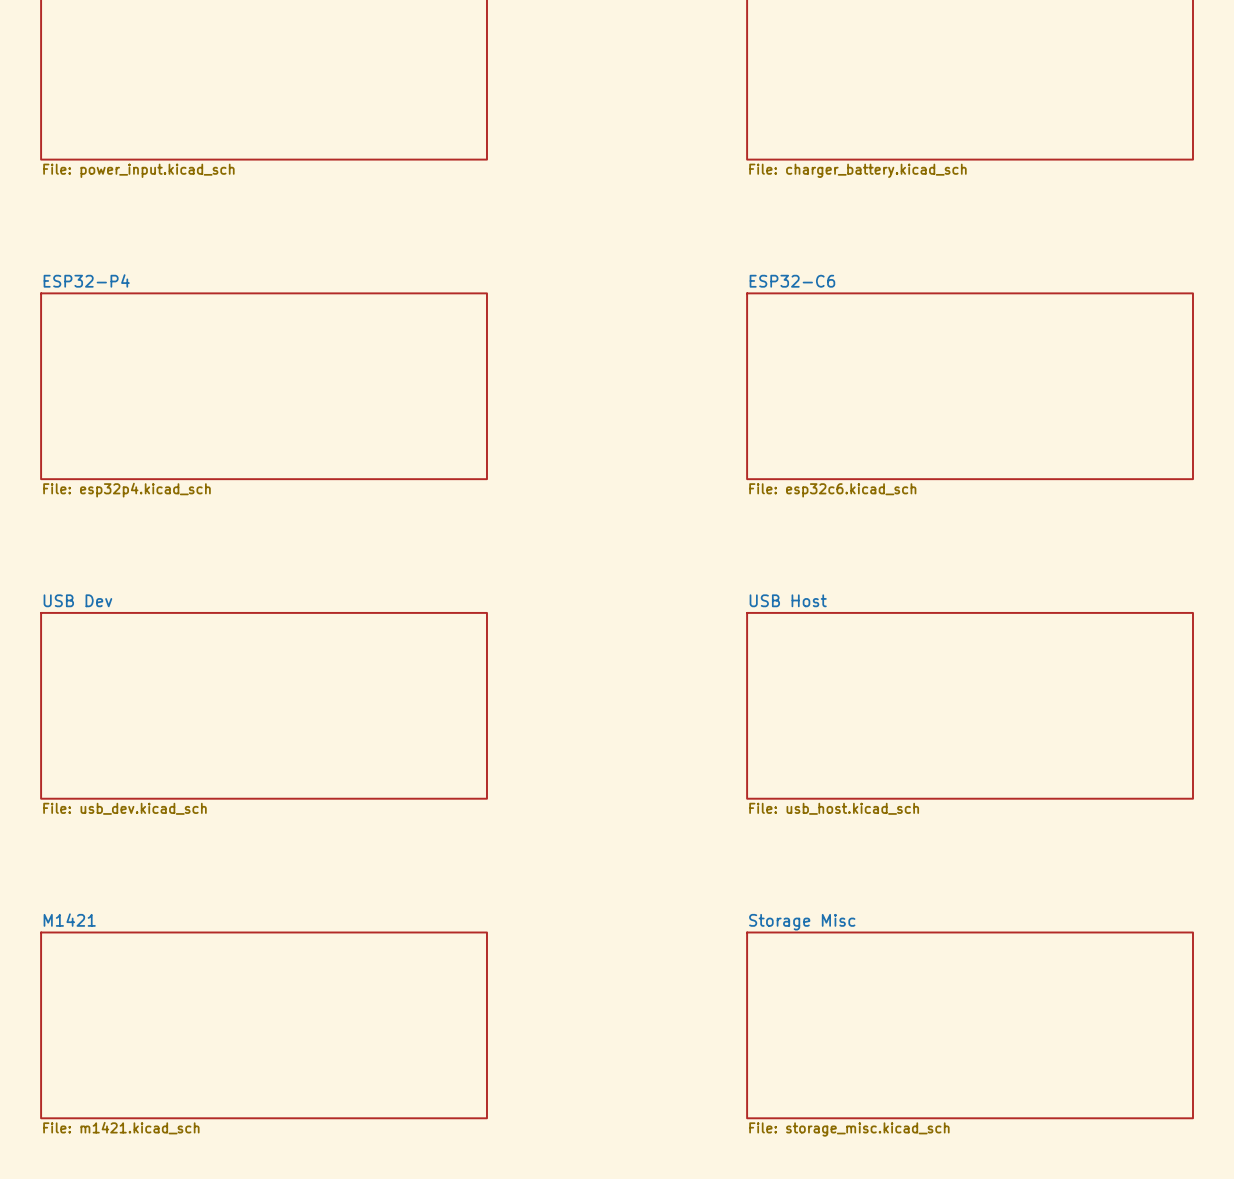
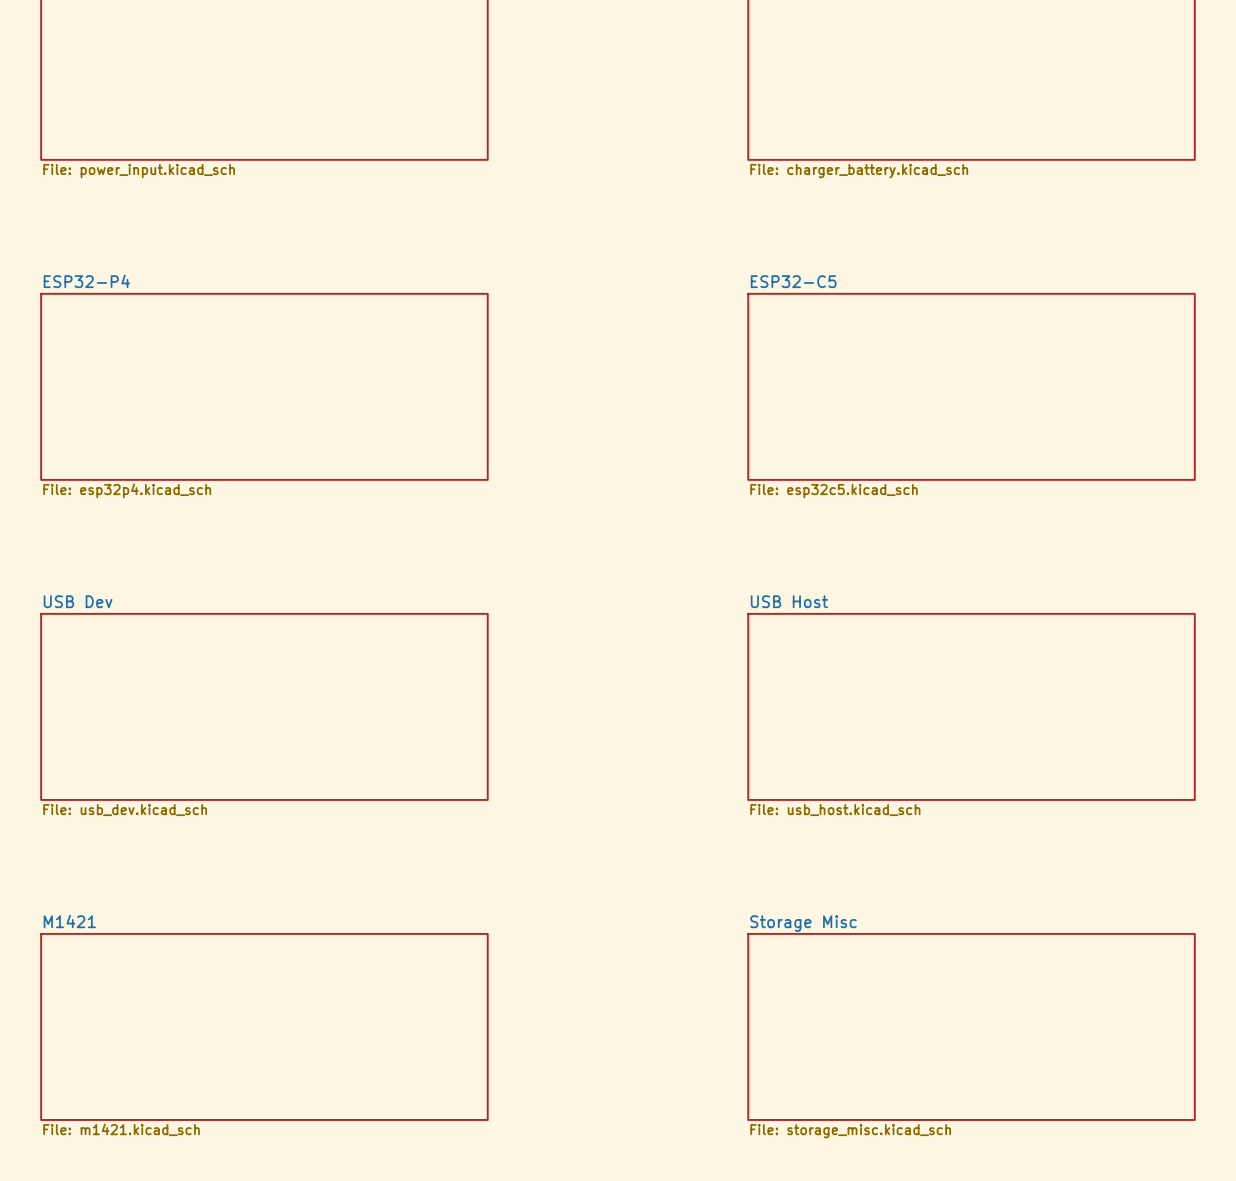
sheet ESP32-C6 name: ESP32-C6 (792, 281) -> ESP32-C5 (793, 281)
sheet ESP32-C6 value: File: esp32c6.kicad_sch (832, 490) -> File: esp32c5.kicad_sch (834, 491)

